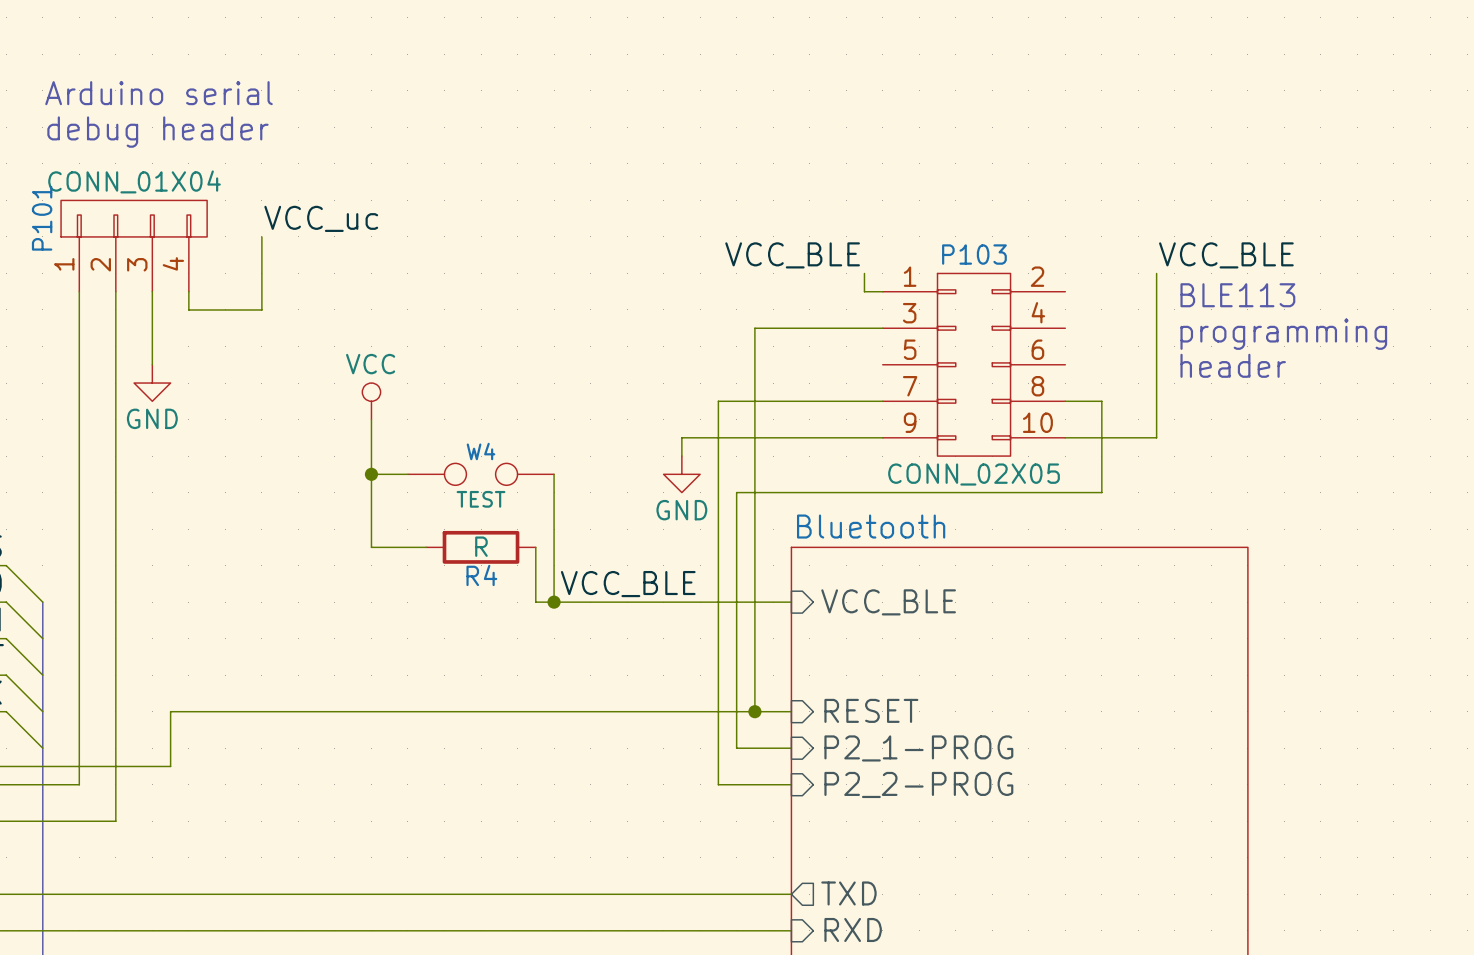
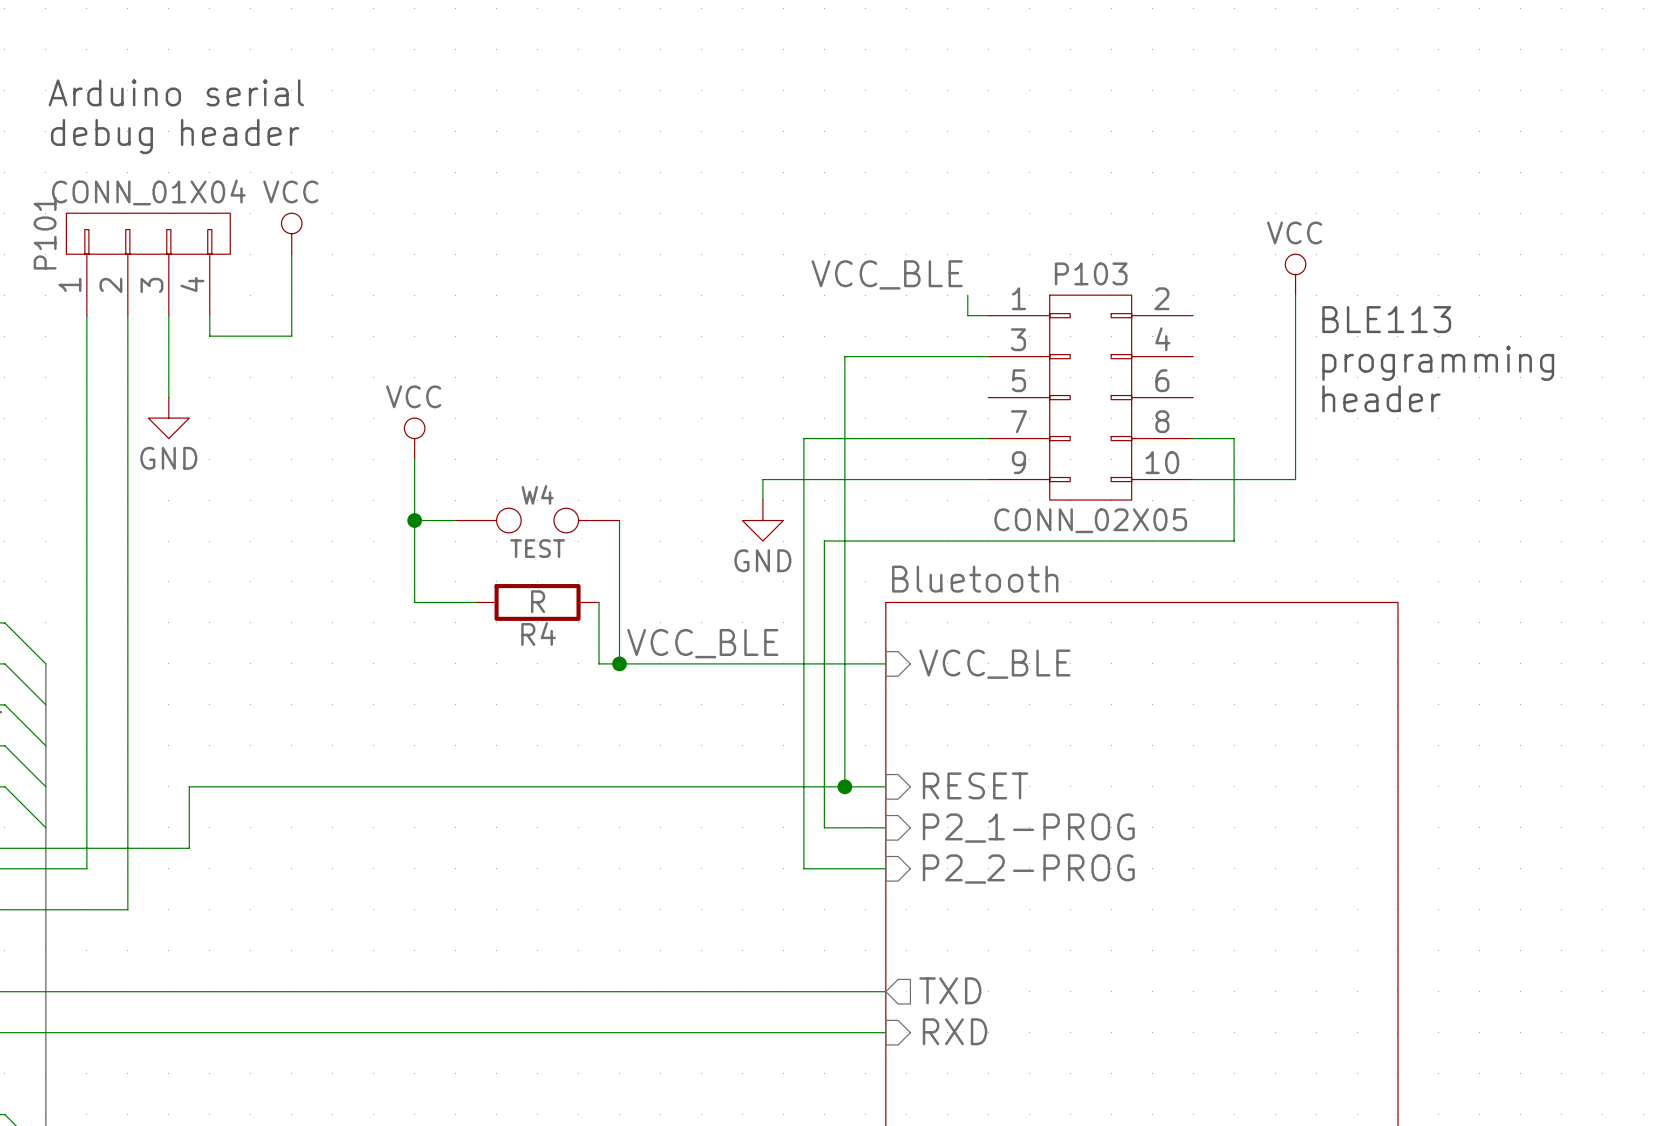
power symbol: none -> VCC (291, 233)
label: VCC_uc (321, 218) -> none
power symbol: none -> VCC (1295, 274)
label: VCC_BLE (1226, 255) -> none

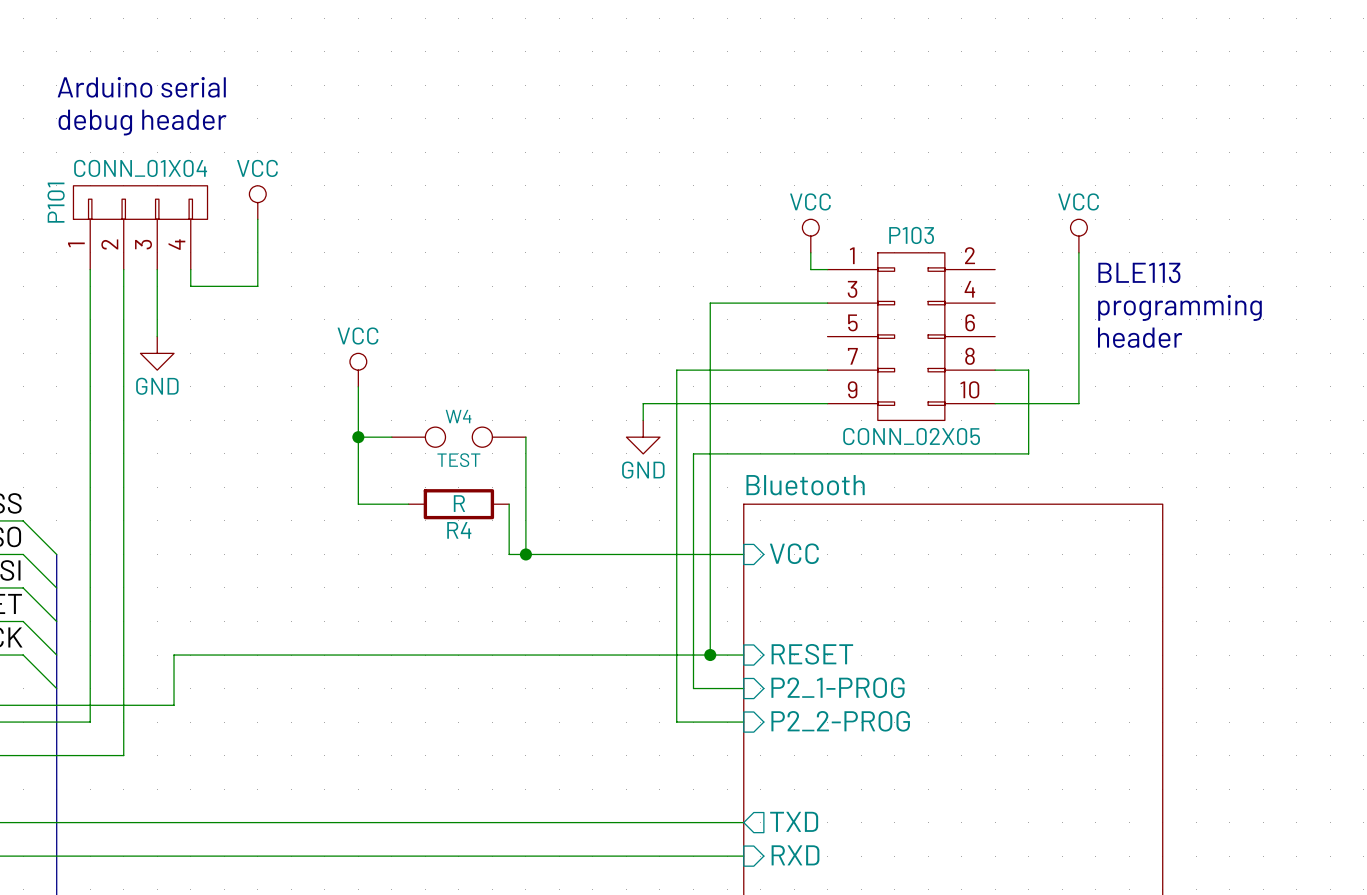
label: VCC_BLE (887, 274) -> none
power symbol: none -> VCC (810, 236)
label: VCC_BLE (702, 643) -> none
sheet pin: VCC_BLE (994, 664) -> VCC (794, 553)

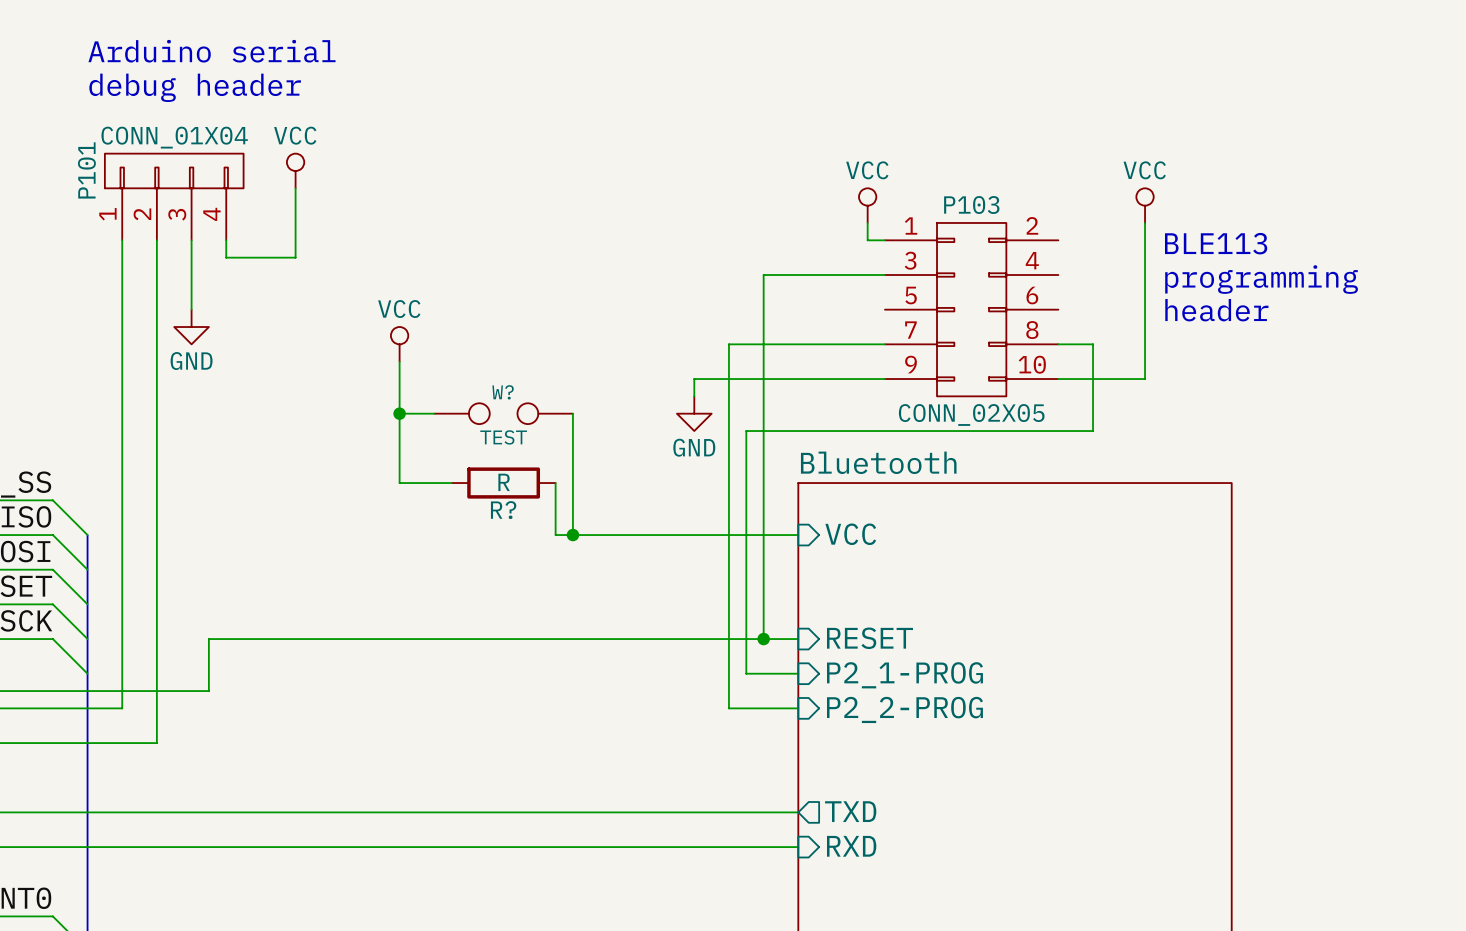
W4 name: W4 (458, 416) -> W? (503, 392)
R4 name: R4 (459, 530) -> R? (503, 510)

